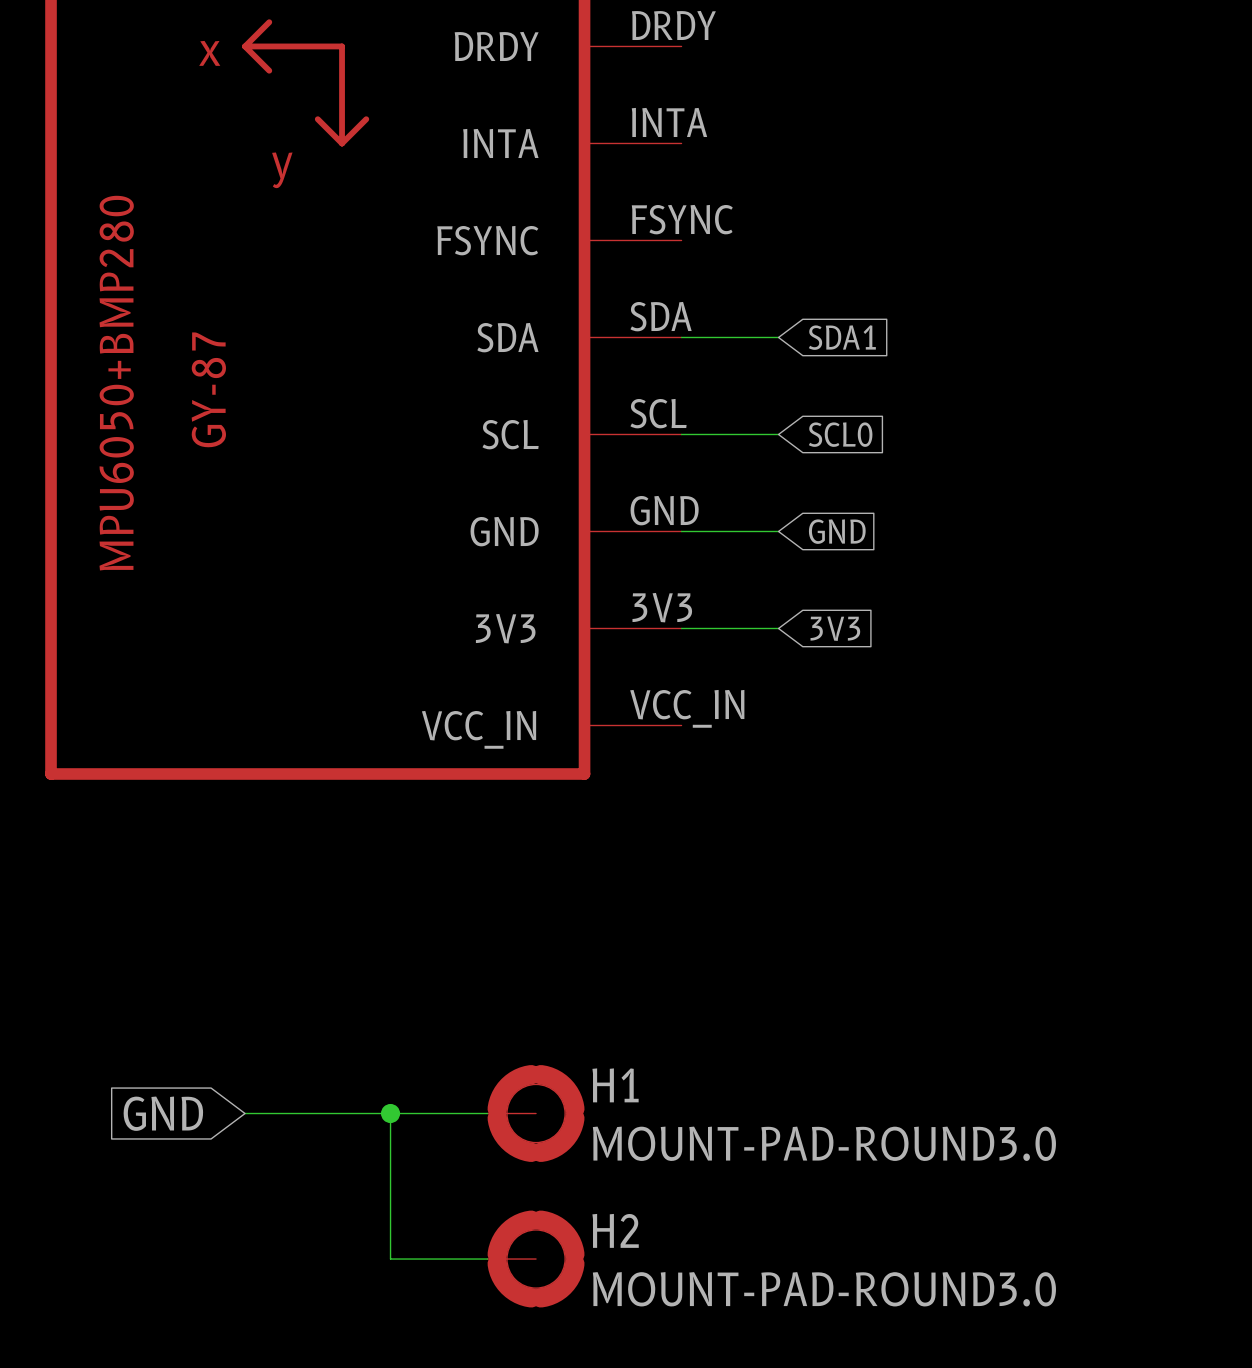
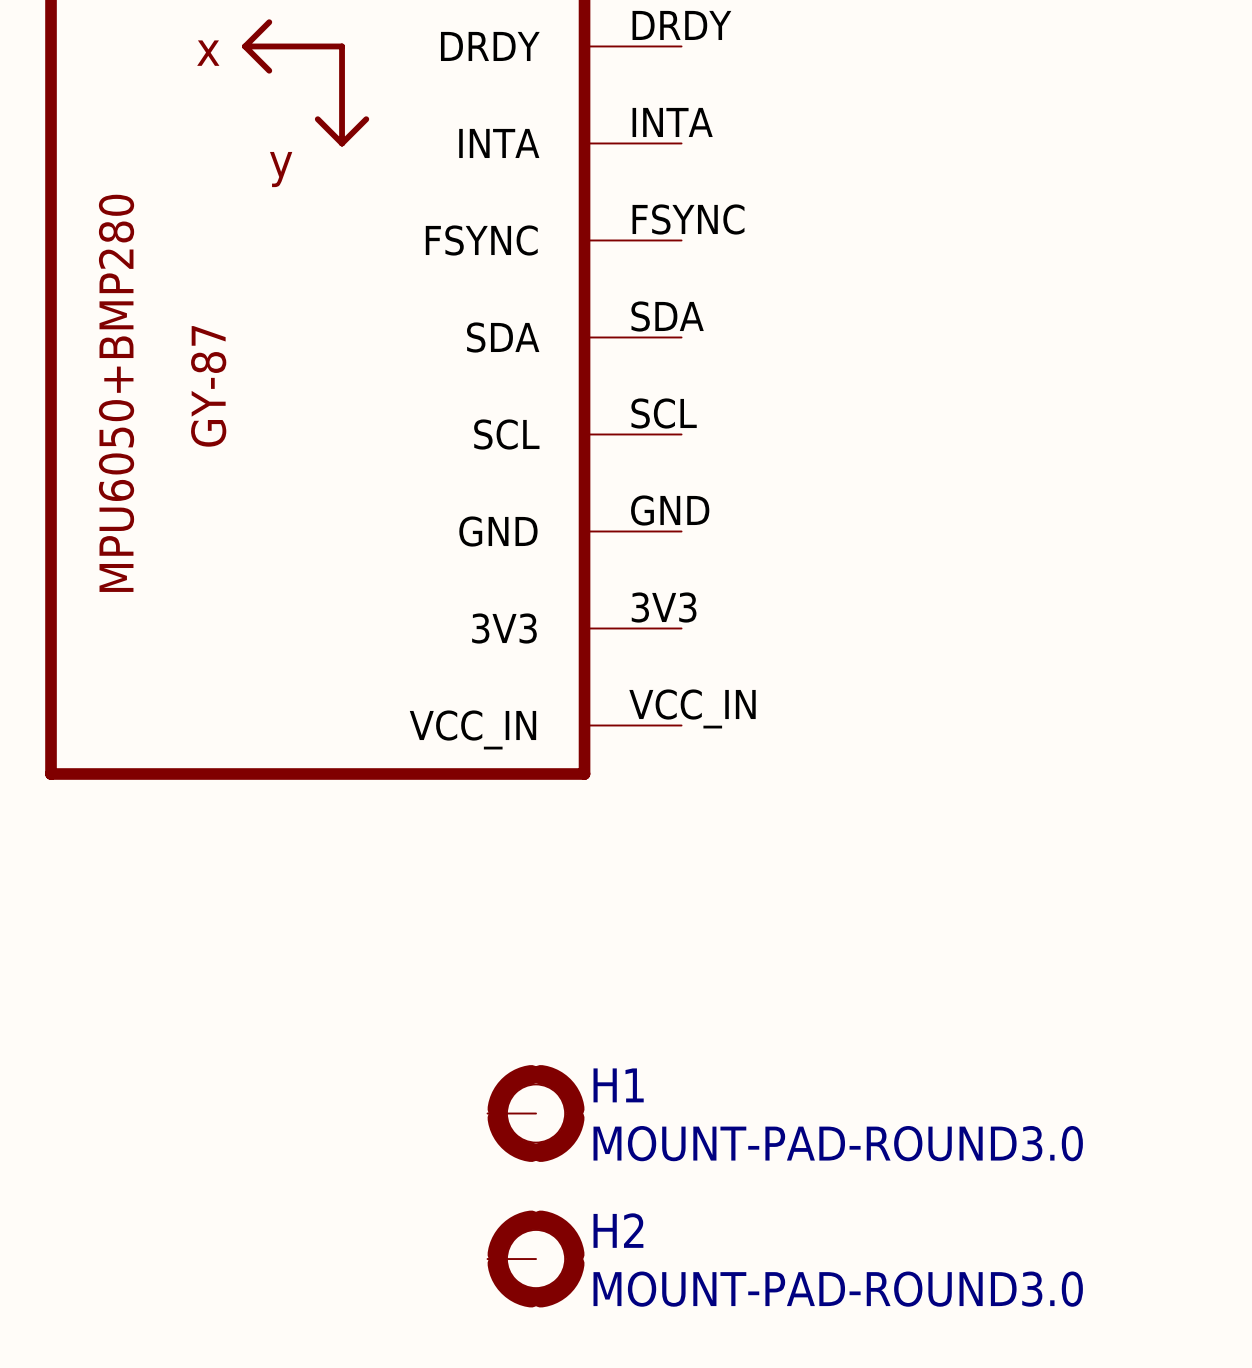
wire: (681, 337) (778, 337) -> none
global label: SDA1 (842, 337) -> none
wire: (681, 434) (778, 434) -> none
global label: SCL0 (840, 434) -> none
wire: (681, 531) (778, 531) -> none
global label: GND (837, 531) -> none
wire: (681, 628) (778, 628) -> none
global label: 3V3 (835, 628) -> none
global label: GND (163, 1113) -> none
wire: (245, 1113) (487, 1113) -> none
wire: (390, 1113) (390, 1259) (487, 1259) -> none
junction: (390, 1113) -> none

